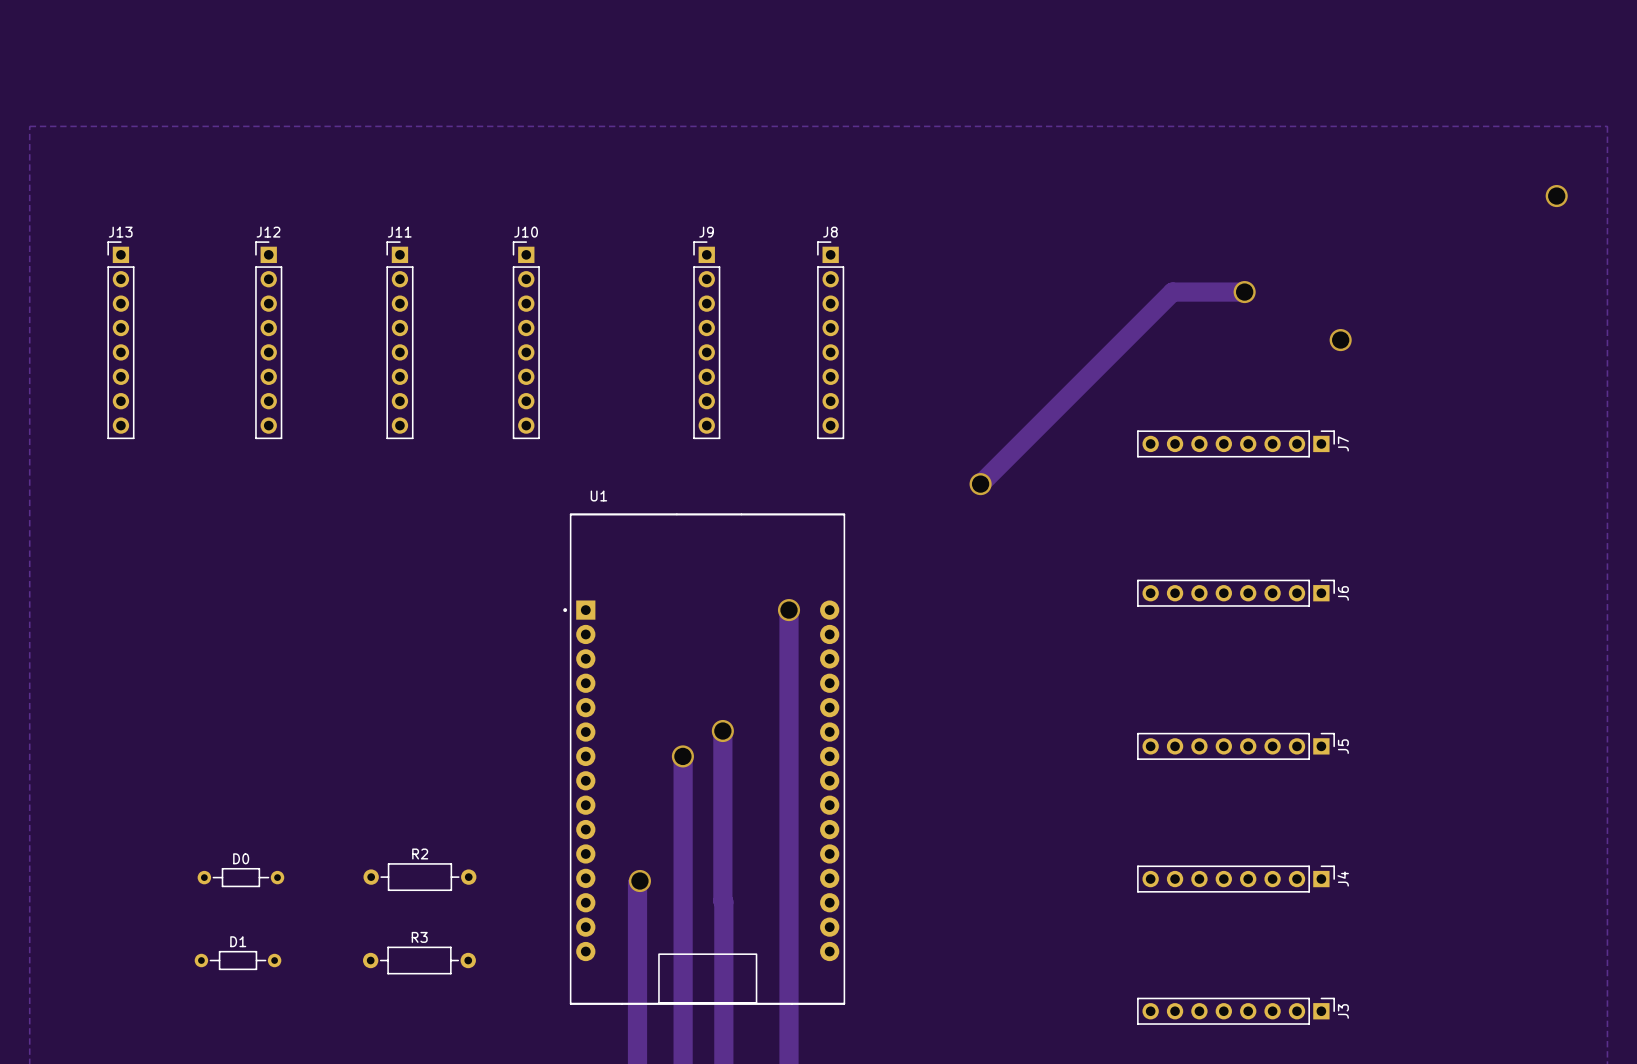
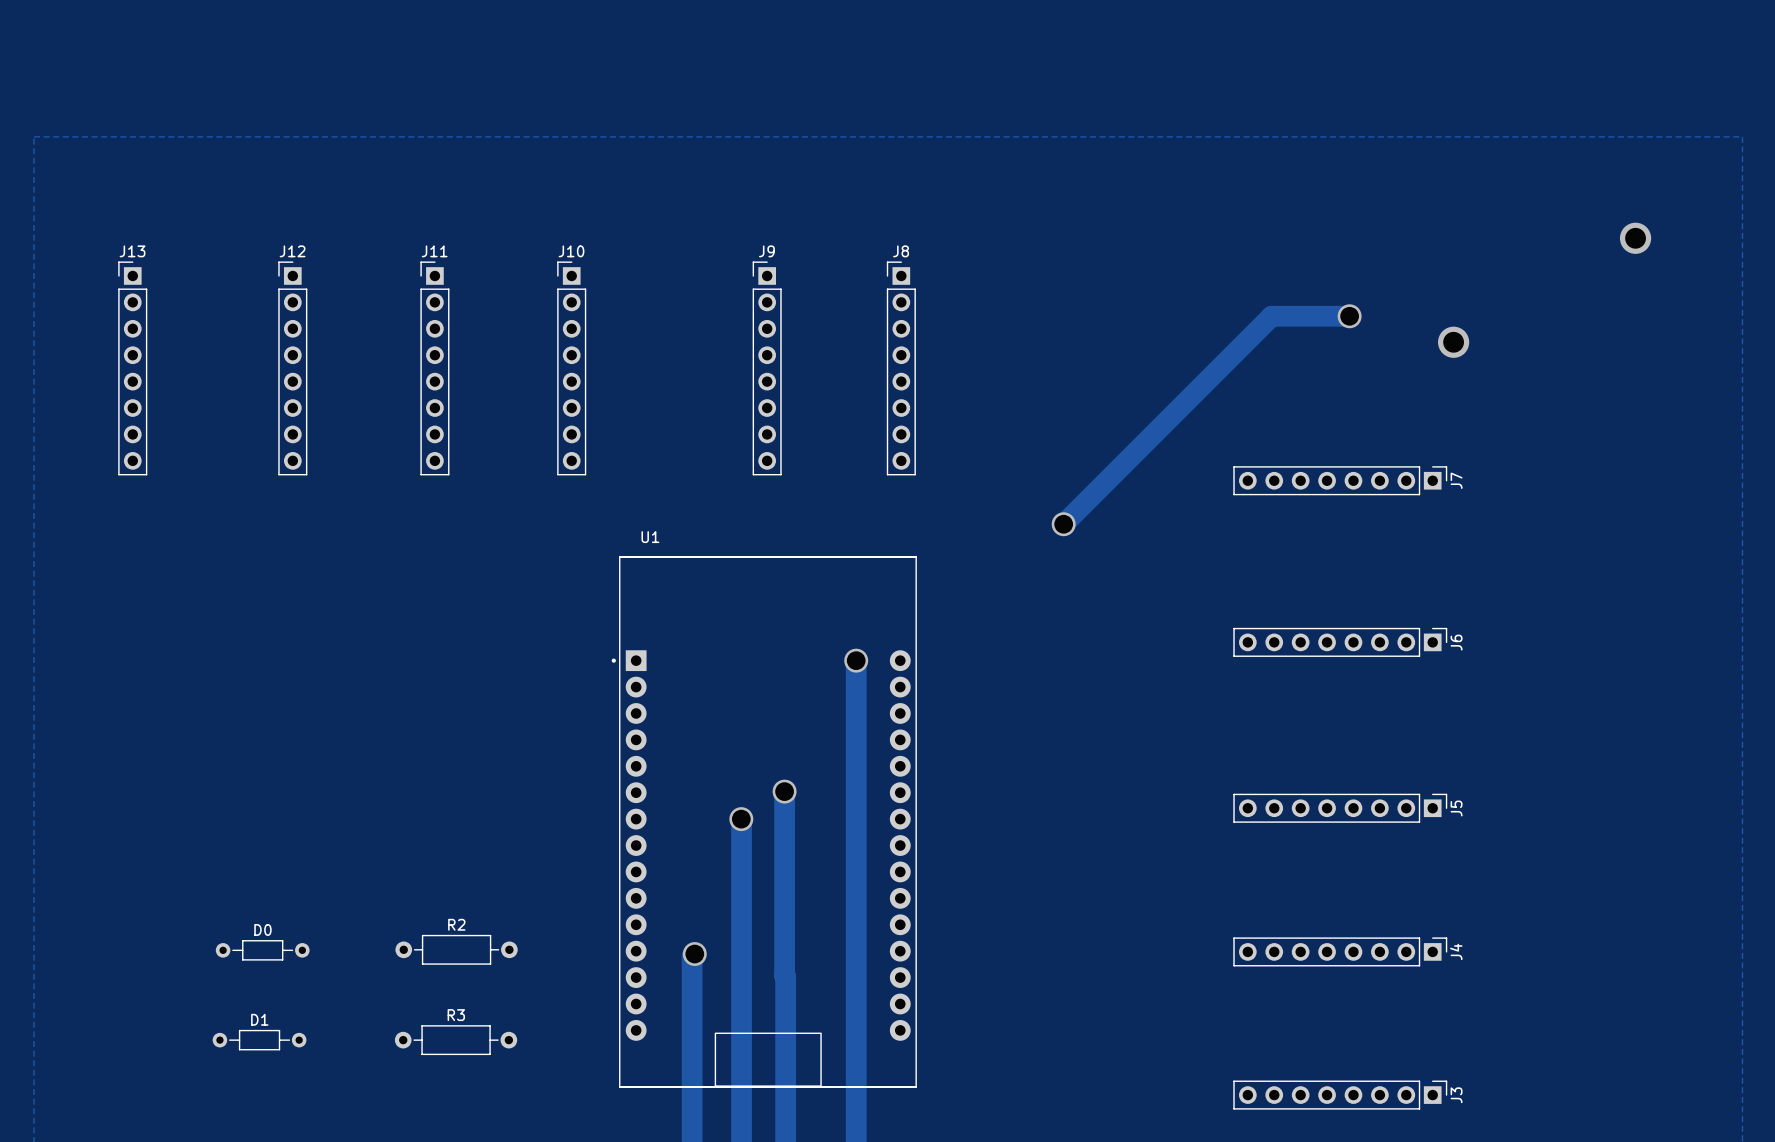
via: (1556, 196) -> none
via: none -> (1635, 238)
via: none -> (1453, 342)
via: (1340, 340) -> none

